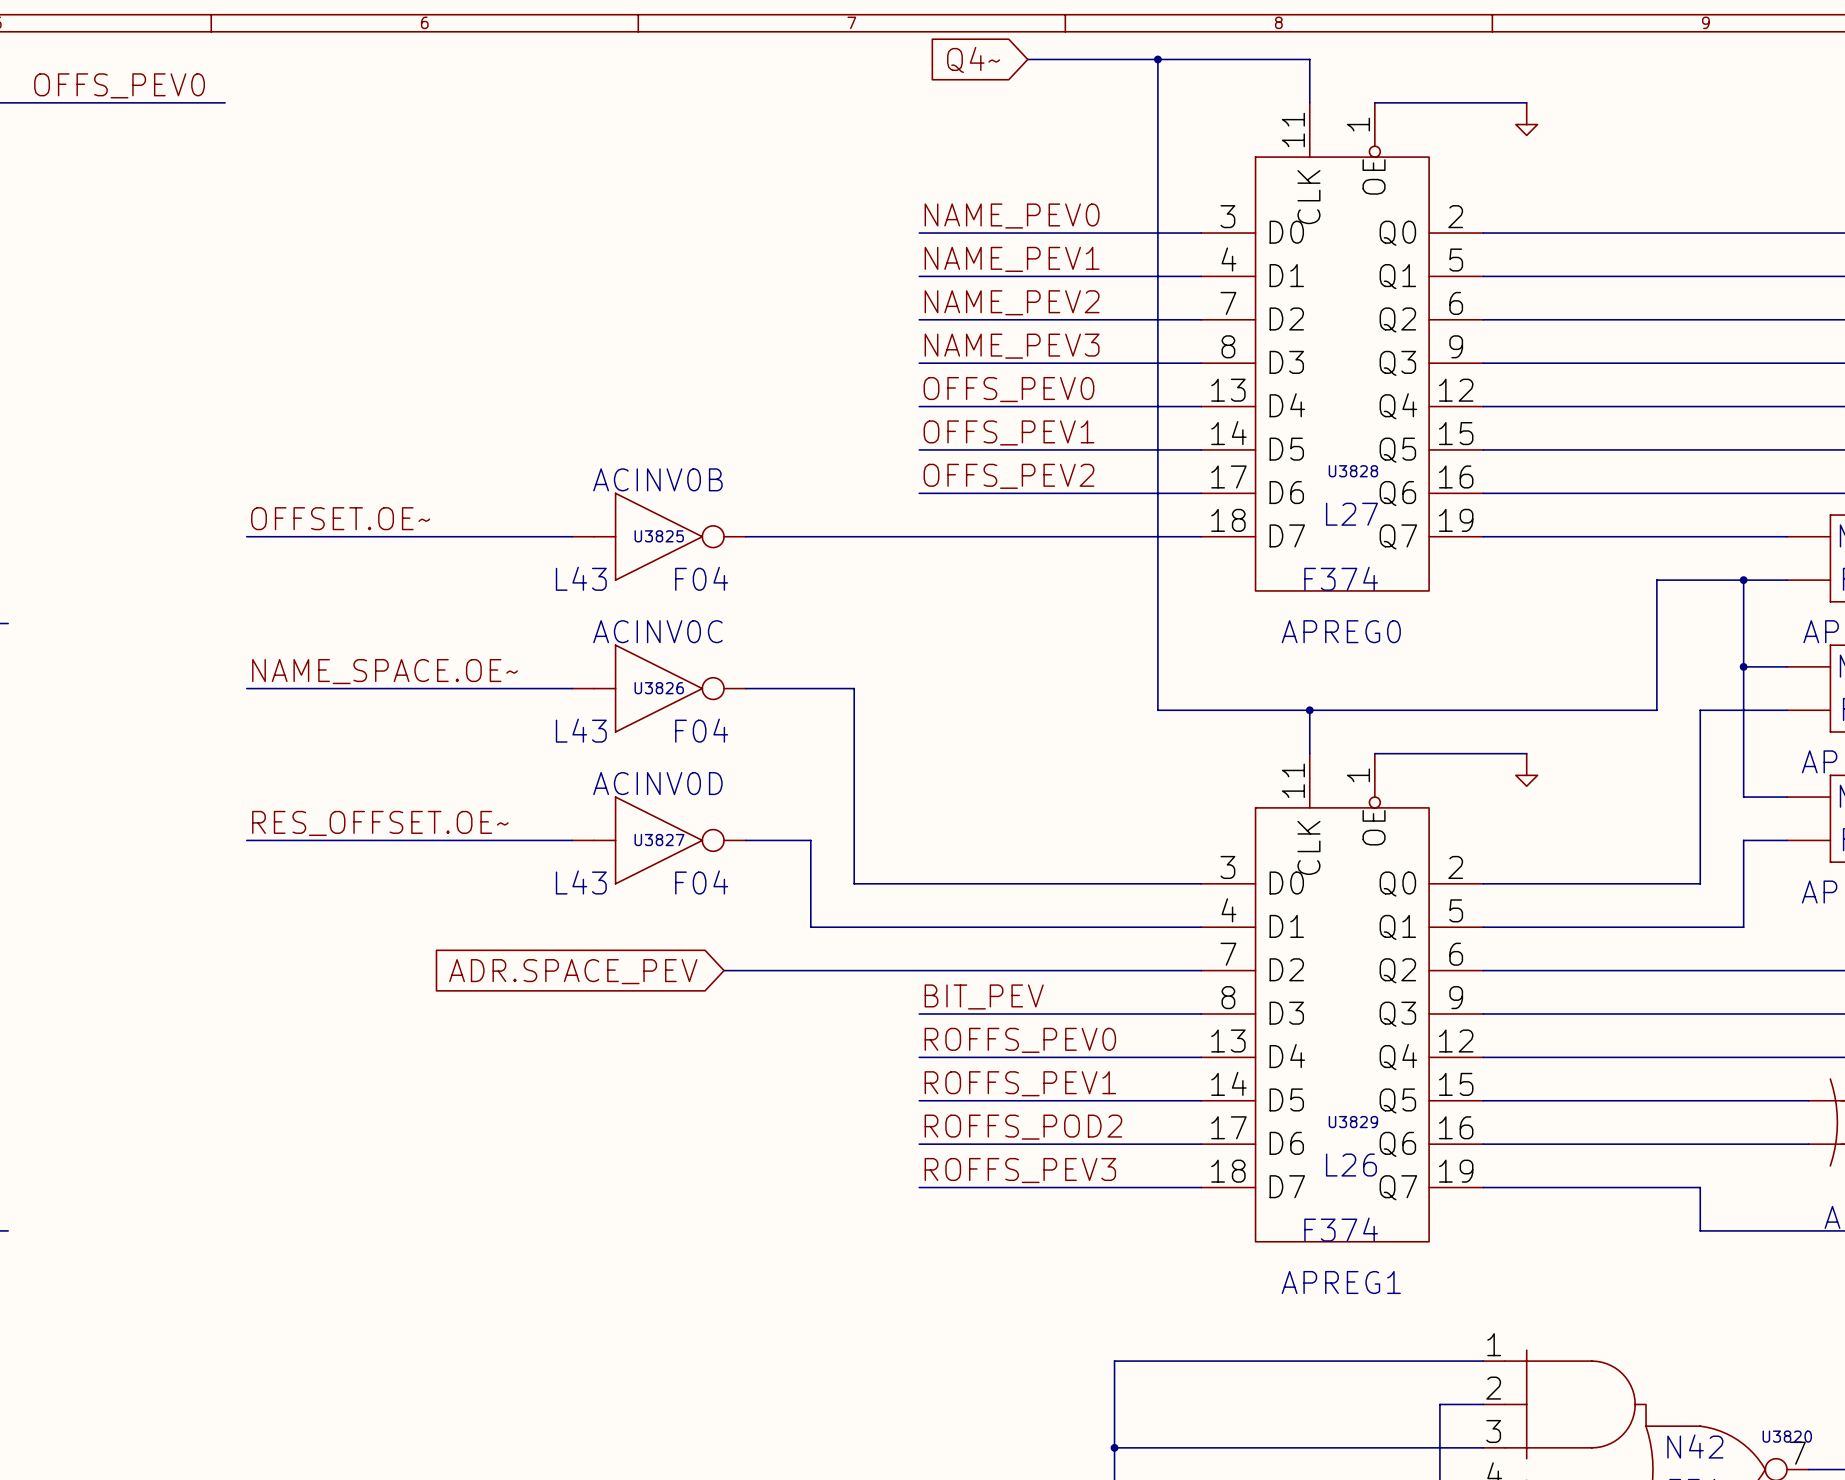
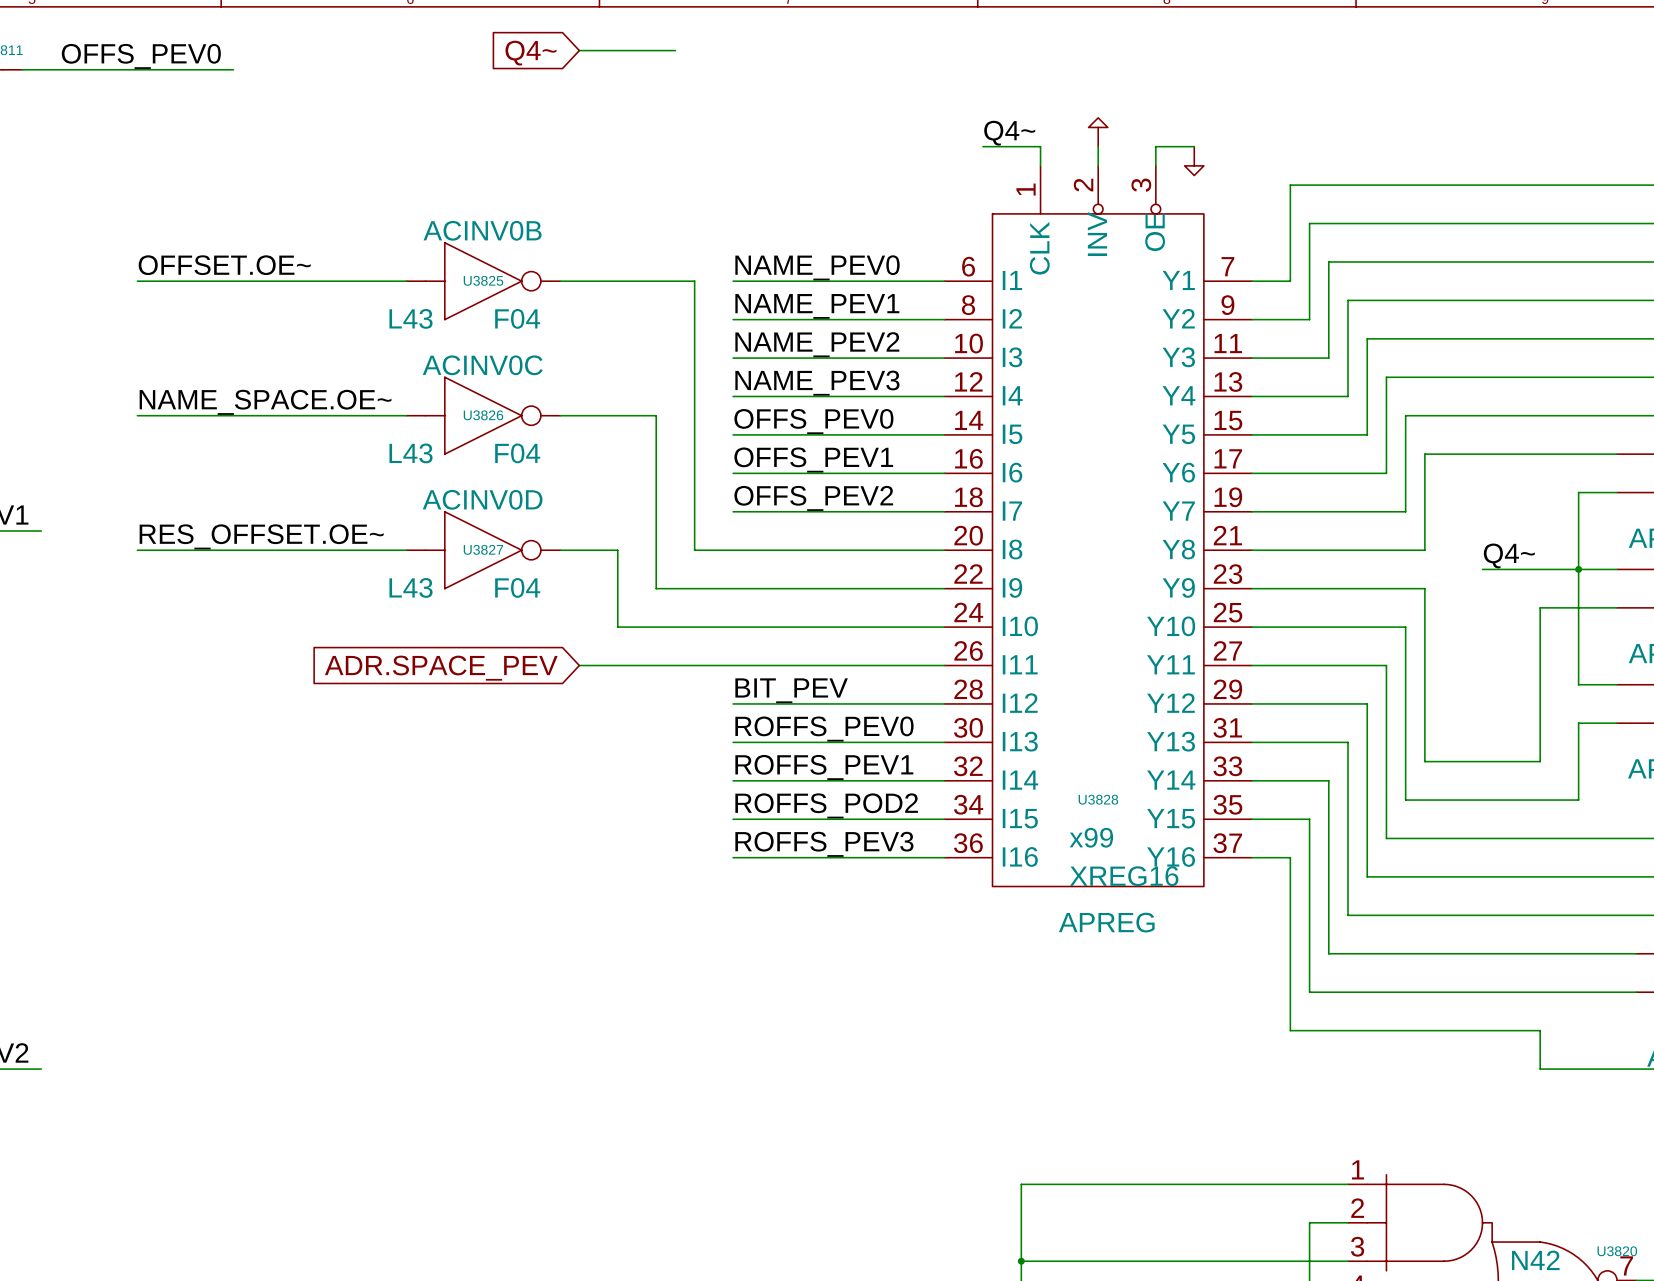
global label: Q4~ (973, 59) -> none
wire: (1027, 59) (1309, 59) (1309, 102) -> none
wire: (1157, 59) (1157, 710) (1656, 710) (1656, 580) (1743, 580) -> none
junction: (1157, 59) -> none
global label: none -> Q4~ (530, 53)
wire: none -> (579, 50) (675, 50)
U3828 symbol: [1201, 102, 1484, 591] -> [944, 165, 1252, 887]
wire: (1374, 102) (1526, 102) -> none
power symbol: (1526, 119) -> none
label: none -> Q4~ (1009, 133)
power symbol: none -> (1098, 131)
wire: none -> (982, 146) (1040, 146) (1040, 165)
wire: none -> (1098, 146) (1098, 165)
wire: none -> (1194, 146) (1155, 146) (1155, 165)
power symbol: none -> (1194, 161)
label position: NAME_PEV0 (1012, 215) -> NAME_PEV0 (817, 267)
wire: (919, 233) (1201, 233) -> none
wire: none -> (1348, 185) (1290, 185) (1290, 281) (1251, 281)
label position: NAME_PEV1 (1012, 259) -> NAME_PEV1 (817, 306)
wire: (919, 276) (1201, 276) -> none
wire: none -> (1348, 223) (1309, 223) (1309, 319) (1251, 319)
label position: NAME_PEV2 (1012, 302) -> NAME_PEV2 (817, 344)
wire: (919, 319) (1201, 319) -> none
wire: none -> (1348, 261) (1328, 261) (1328, 358) (1251, 358)
label: none -> OFFSET.OE~ (224, 265)
wire: none -> (137, 281) (406, 281)
wire: none -> (560, 281) (694, 281) (694, 550) (944, 550)
wire: none -> (733, 281) (944, 281)
label position: NAME_PEV3 (1012, 346) -> NAME_PEV3 (817, 383)
wire: (919, 363) (1201, 363) -> none
wire: none -> (1348, 300) (1348, 396) (1251, 396)
wire: none -> (733, 319) (944, 319)
label position: OFFS_PEV0 (1008, 389) -> OFFS_PEV0 (813, 421)
wire: (919, 406) (1201, 406) -> none
wire: (1483, 406) (1505, 406) -> (1251, 434) (1367, 434) (1367, 338)
wire: none -> (733, 358) (944, 358)
label position: OFFS_PEV1 (1008, 432) -> OFFS_PEV1 (813, 459)
wire: (919, 449) (1201, 449) -> none
wire: (1483, 449) (1526, 449) -> (1251, 473) (1386, 473) (1386, 377)
wire: none -> (733, 396) (944, 396)
U3828 name position: U3828 (1353, 471) -> U3828 (1098, 799)
label: none -> NAME_SPACE.OE~ (265, 402)
label position: OFFS_PEV2 (1008, 476) -> OFFS_PEV2 (813, 498)
wire: none -> (137, 415) (406, 415)
wire: none -> (560, 415) (656, 415) (656, 588) (694, 588)
wire: (919, 493) (1201, 493) -> none
wire: (1483, 493) (1548, 493) -> (1251, 511) (1405, 511) (1405, 415)
U3828 text: L27 (1351, 514) -> x99 (1091, 837)
wire: none -> (733, 434) (944, 434)
label: OFFSET.OE~ (340, 518) -> none
wire: (246, 536) (572, 536) -> none
U3825 position: (658, 536) -> (483, 281)
wire: (745, 536) (1201, 536) -> none
wire: (1483, 536) (1570, 536) -> (1251, 550) (1424, 550) (1424, 454)
wire: none -> (733, 473) (944, 473)
U3828 value: F374 (1341, 578) -> XREG16 (1124, 876)
junction: (1743, 580) -> none
wire: none -> (733, 511) (944, 511)
label: none -> RES_OFFSET.OE~ (261, 536)
U3828 text: APREG0 (1341, 631) -> APREG (1106, 922)
wire: none -> (137, 550) (406, 550)
wire: none -> (560, 550) (617, 550) (617, 627) (944, 627)
label: none -> Q4~ (1509, 555)
wire: none -> (1482, 569) (1578, 569)
label: NAME_SPACE.OE~ (385, 671) -> none
wire: (246, 688) (572, 688) -> none
U3826 position: (658, 688) -> (483, 415)
wire: (854, 688) (854, 883) (1201, 883) -> (790, 588) (944, 588)
wire: (1309, 710) (1309, 753) -> none
junction: (1309, 710) -> none
wire: (1374, 753) (1526, 753) -> none
power symbol: (1526, 770) -> none
wire: none -> (579, 665) (944, 665)
global label: none -> ADR.SPACE_PEV (441, 668)
label: none -> BIT_PEV (791, 690)
wire: none -> (733, 703) (944, 703)
label: RES_OFFSET.OE~ (380, 823) -> none
wire: (246, 840) (572, 840) -> none
U3827 position: (658, 840) -> (483, 550)
wire: (745, 840) (810, 840) (810, 927) (1201, 927) -> none
label: none -> ROFFS_PEV0 (824, 729)
wire: none -> (733, 742) (944, 742)
wire: none -> (1251, 742) (1348, 742) (1348, 915)
wire: (1483, 883) (1570, 883) -> (1251, 588) (1424, 588) (1424, 761)
label: none -> ROFFS_PEV1 (824, 767)
wire: none -> (733, 780) (944, 780)
wire: none -> (1251, 780) (1328, 780) (1328, 953) (1348, 953)
wire: (1483, 927) (1548, 927) -> (1251, 627) (1405, 627) (1405, 800)
label: none -> ROFFS_POD2 (826, 805)
wire: none -> (733, 819) (944, 819)
wire: none -> (1251, 819) (1309, 819) (1309, 992) (1348, 992)
wire: (724, 970) (1201, 970) -> none
wire: (1483, 970) (1526, 970) -> (1251, 665) (1386, 665) (1386, 838)
global label: ADR.SPACE_PEV (573, 971) -> none
label: none -> ROFFS_PEV3 (824, 844)
wire: none -> (733, 857) (944, 857)
wire: none -> (1251, 857) (1290, 857) (1290, 1030) (1348, 1030)
label: BIT_PEV (984, 996) -> none
U3829: F374 (1342, 997) -> none
wire: (919, 1013) (1201, 1013) -> none
wire: (1483, 1013) (1505, 1013) -> (1251, 703) (1367, 703) (1367, 876)
label: ROFFS_PEV0 (1020, 1040) -> none
wire: (919, 1057) (1201, 1057) -> none
label: ROFFS_PEV1 (1020, 1083) -> none
wire: (919, 1100) (1201, 1100) -> none
label: ROFFS_POD2 (1023, 1127) -> none
wire: (919, 1144) (1201, 1144) -> none
label: ROFFS_PEV3 (1020, 1170) -> none
wire: (919, 1187) (1201, 1187) -> none

